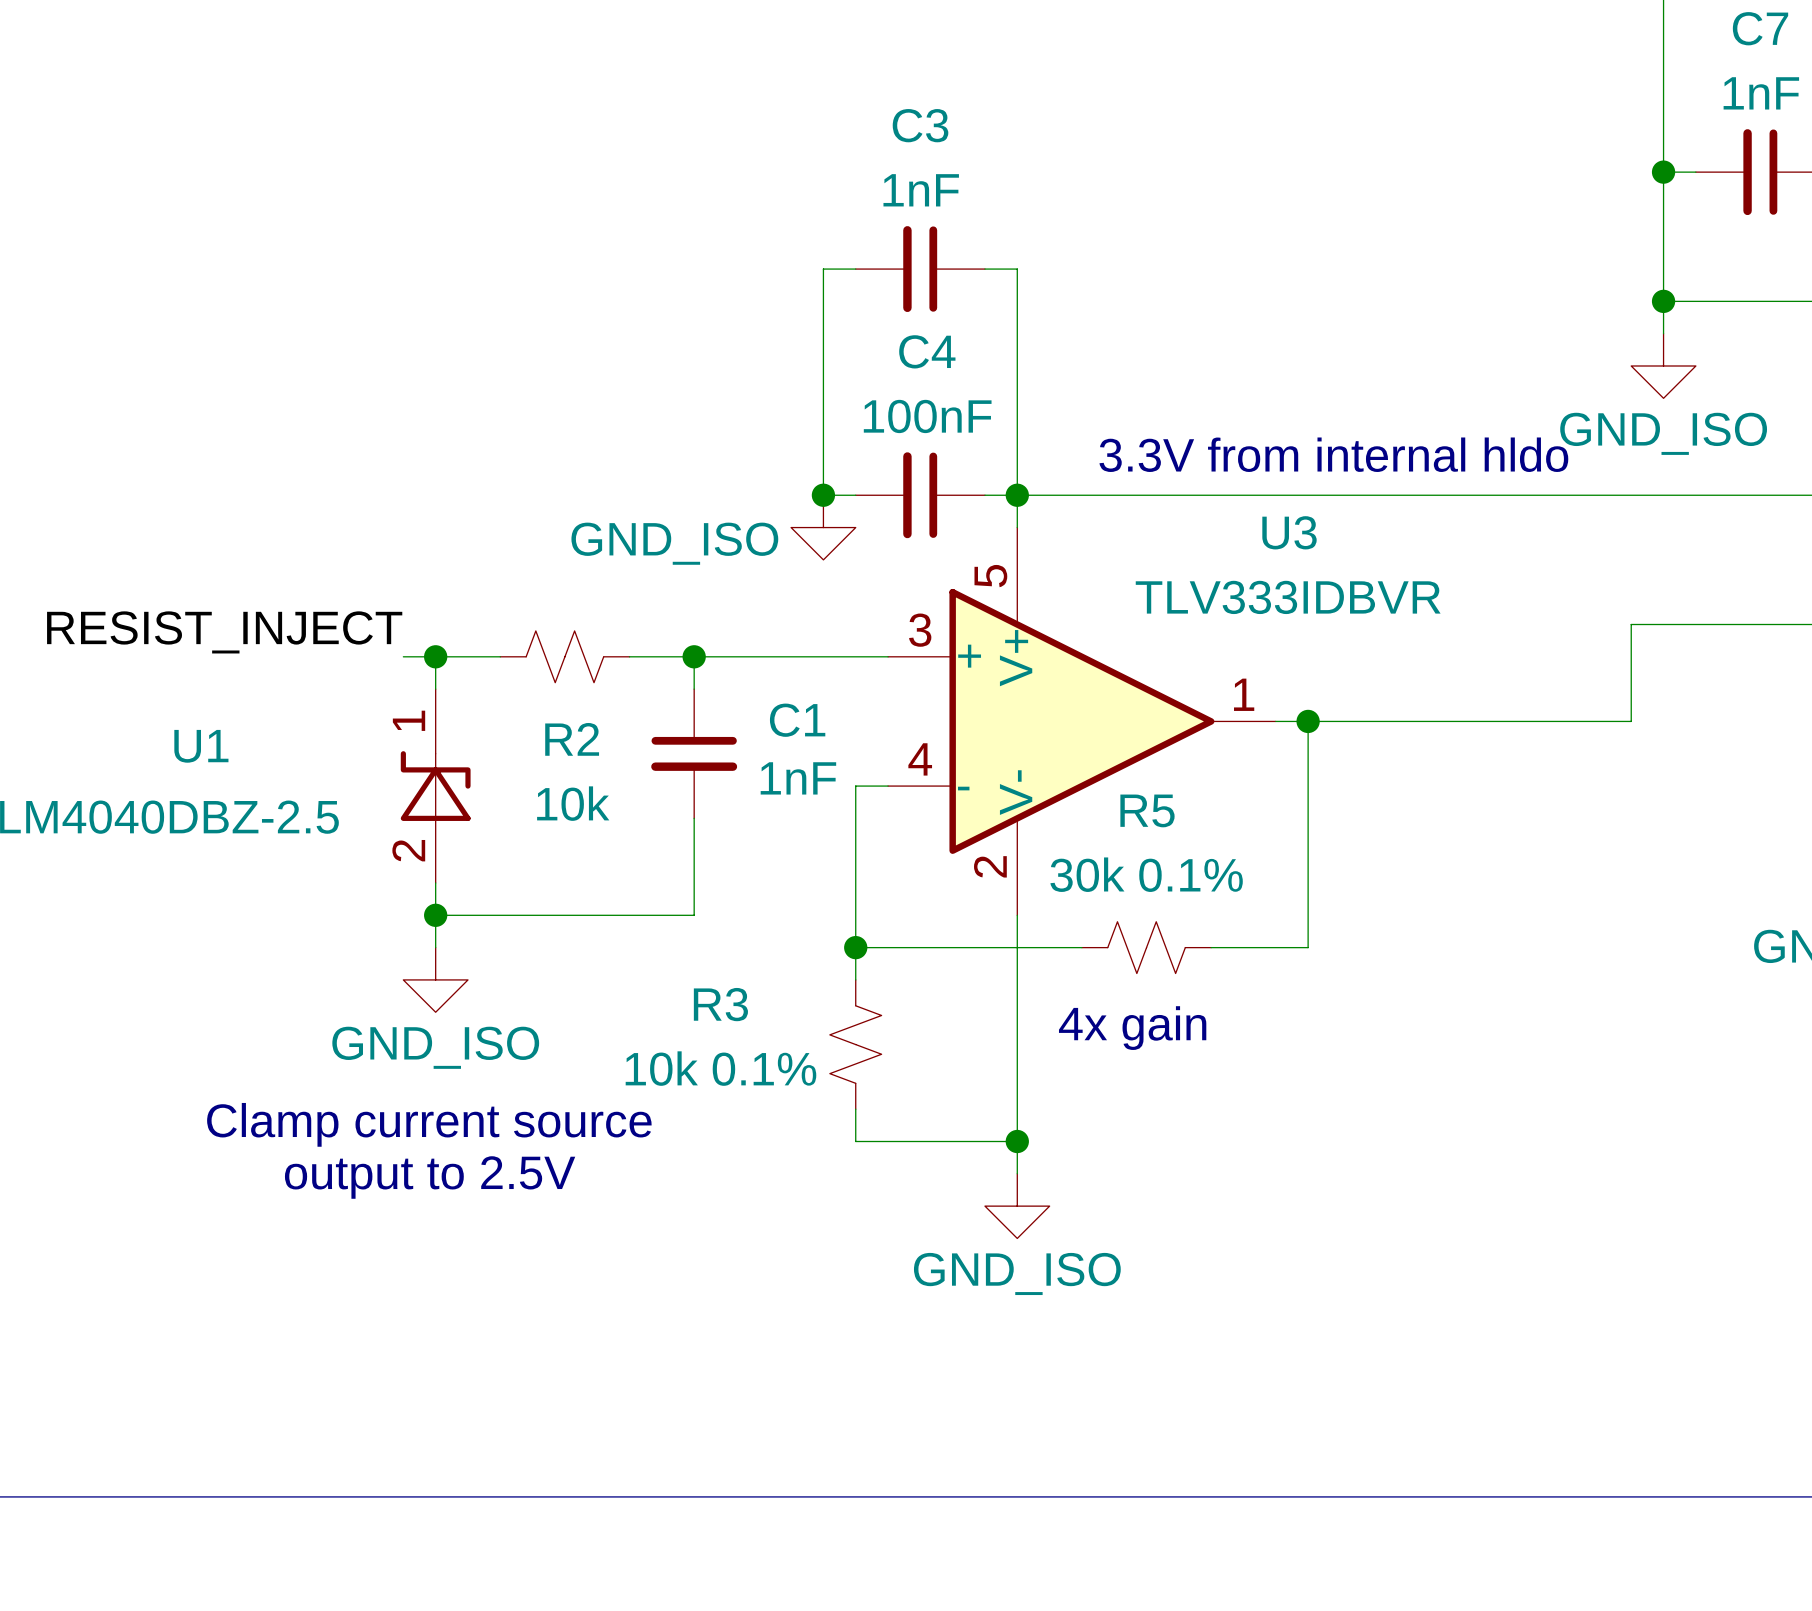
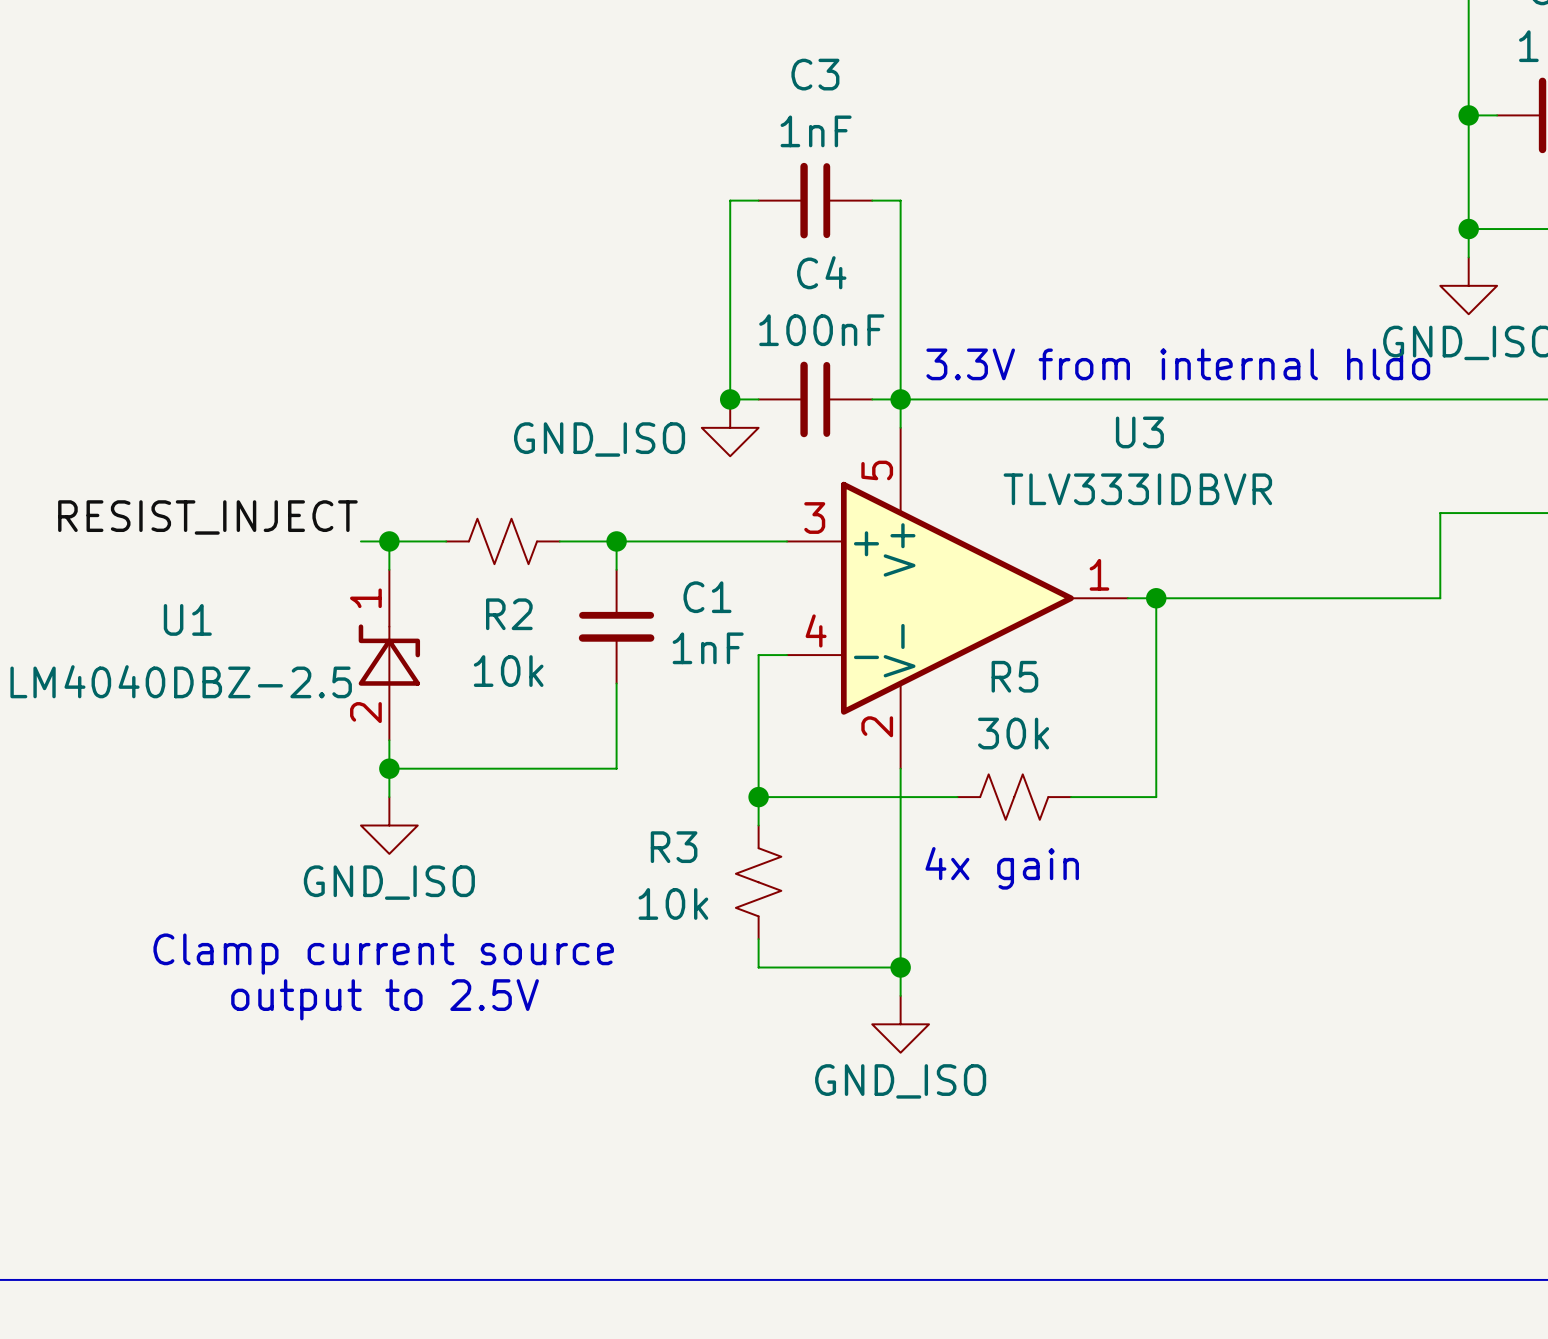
R5 value: 30k 0.1% (1146, 874) -> 30k (1013, 733)
R3 name position: R3 (720, 1004) -> R3 (674, 847)
R3 value: 10k 0.1% (720, 1068) -> 10k (673, 903)

